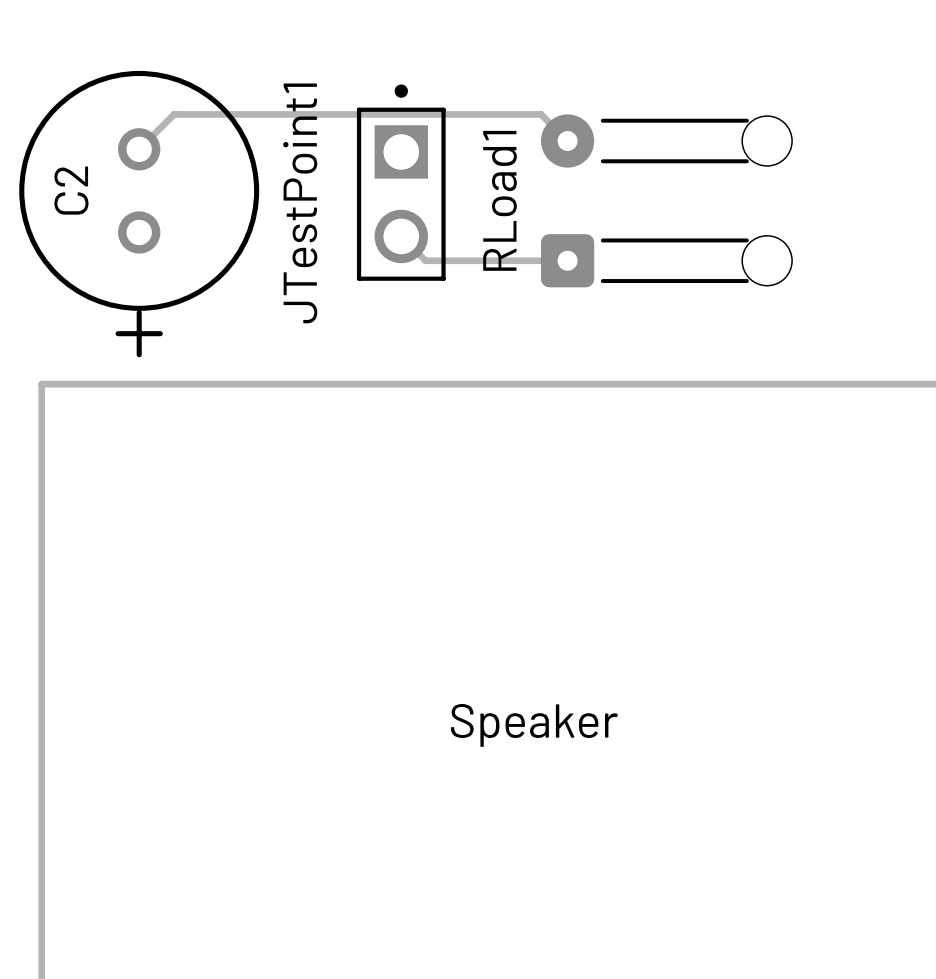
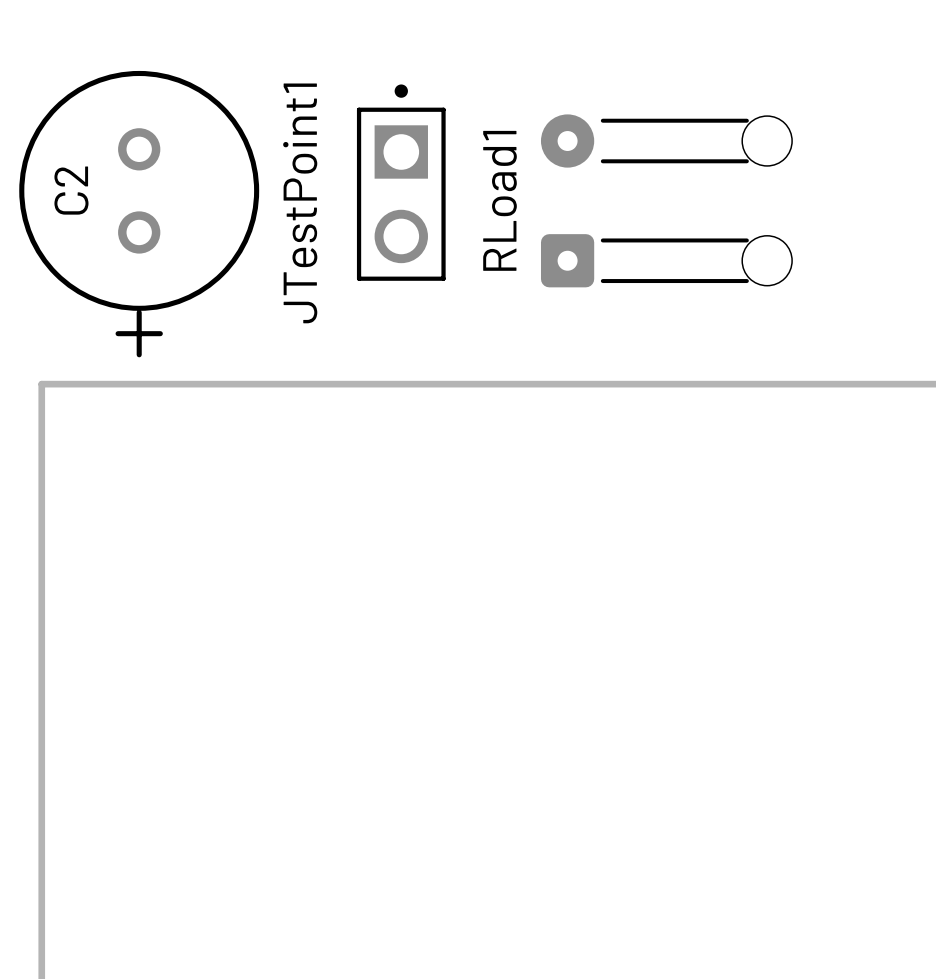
track: (567, 141) (540, 114) (174, 114) (139, 149) -> none
track: (401, 236) (425, 260) (567, 260) -> none
text: Speaker (534, 725) -> none

